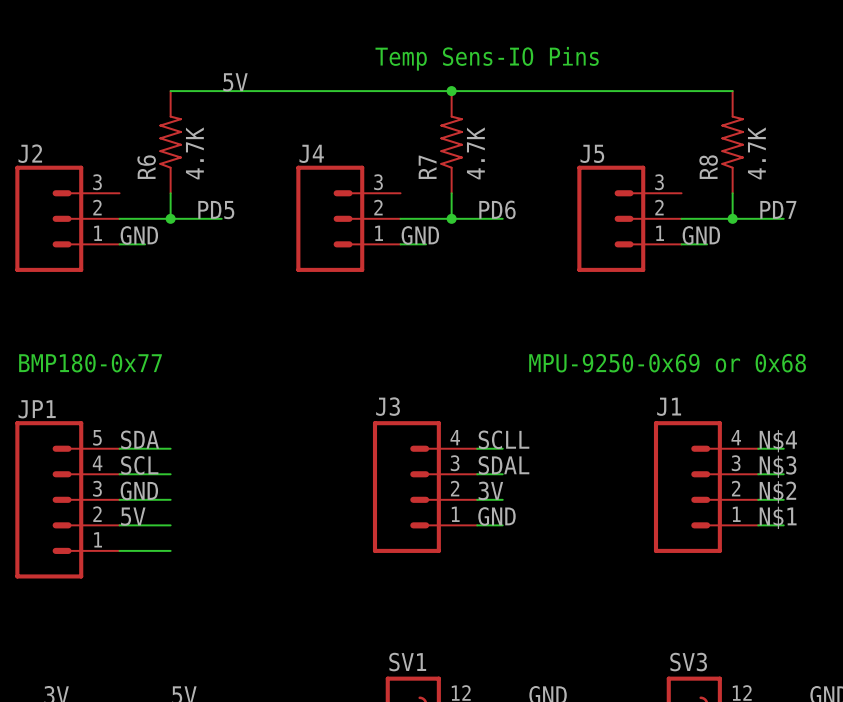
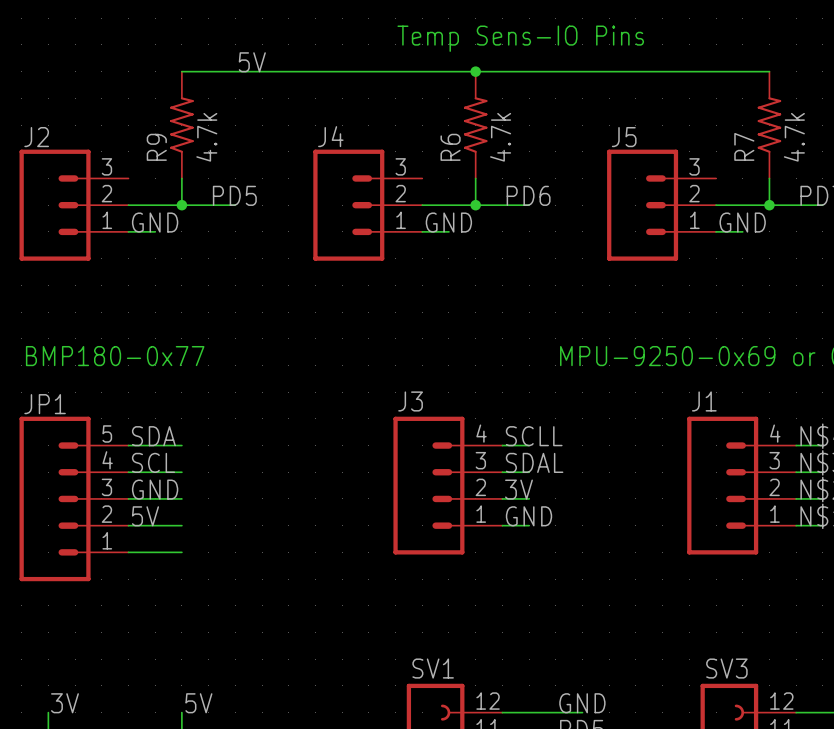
R6 value: 4.7K (194, 153) -> 4.7k (206, 137)
R7 value: 4.7K (475, 153) -> 4.7k (500, 137)
R8 value: 4.7K (756, 153) -> 4.7k (794, 137)
R6 name: R6 (146, 167) -> R9 (156, 147)
R7 name: R7 (427, 167) -> R6 (450, 147)
R8 name: R8 (708, 167) -> R7 (744, 146)

